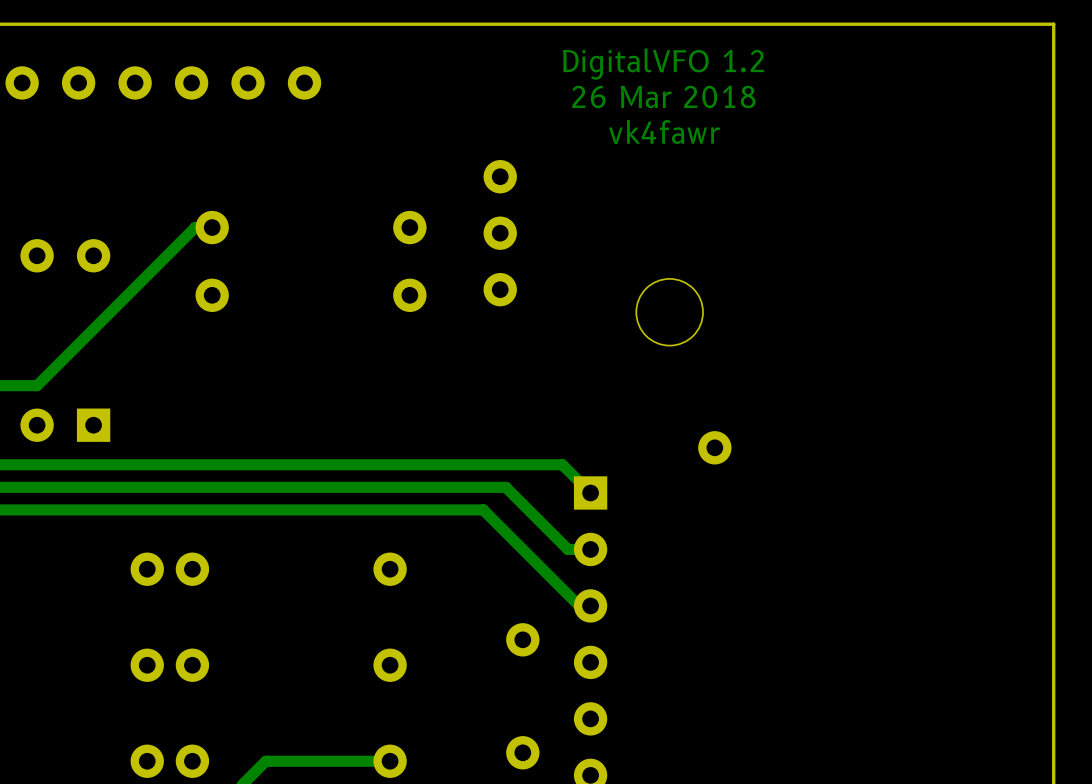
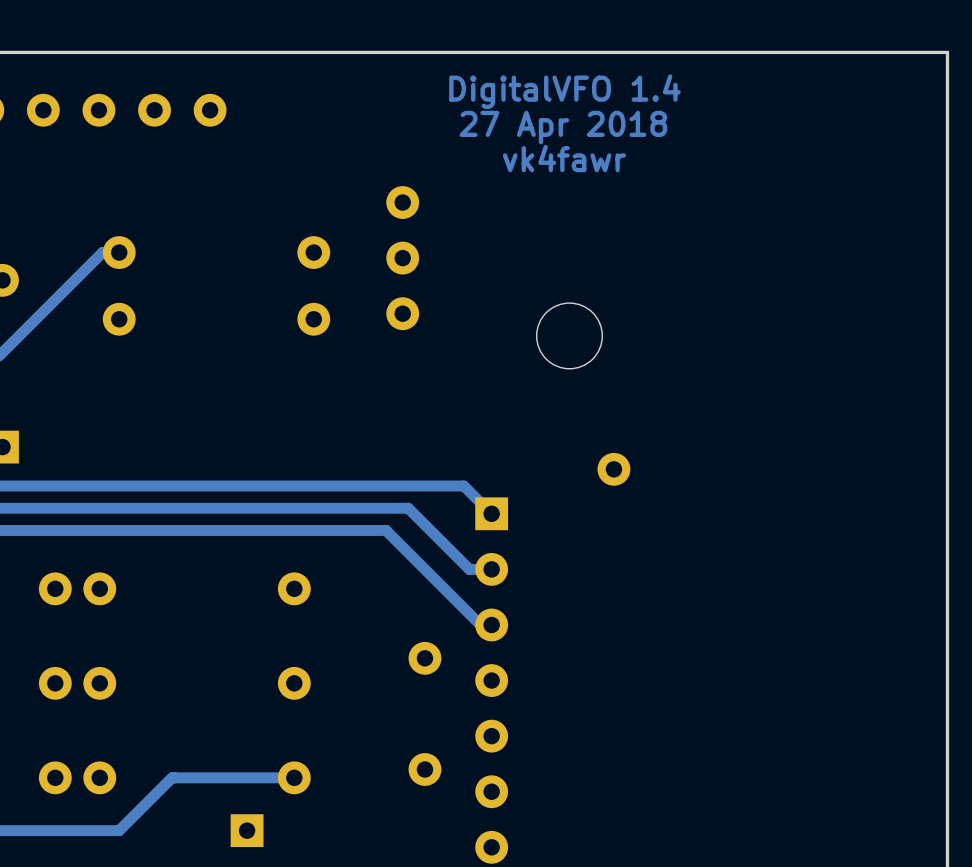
text: DigitalVFO 1.2 (663, 64) -> DigitalVFO 1.4 (564, 91)
text: 26 Mar 2018 (663, 96) -> 27 Apr 2018 (563, 127)

